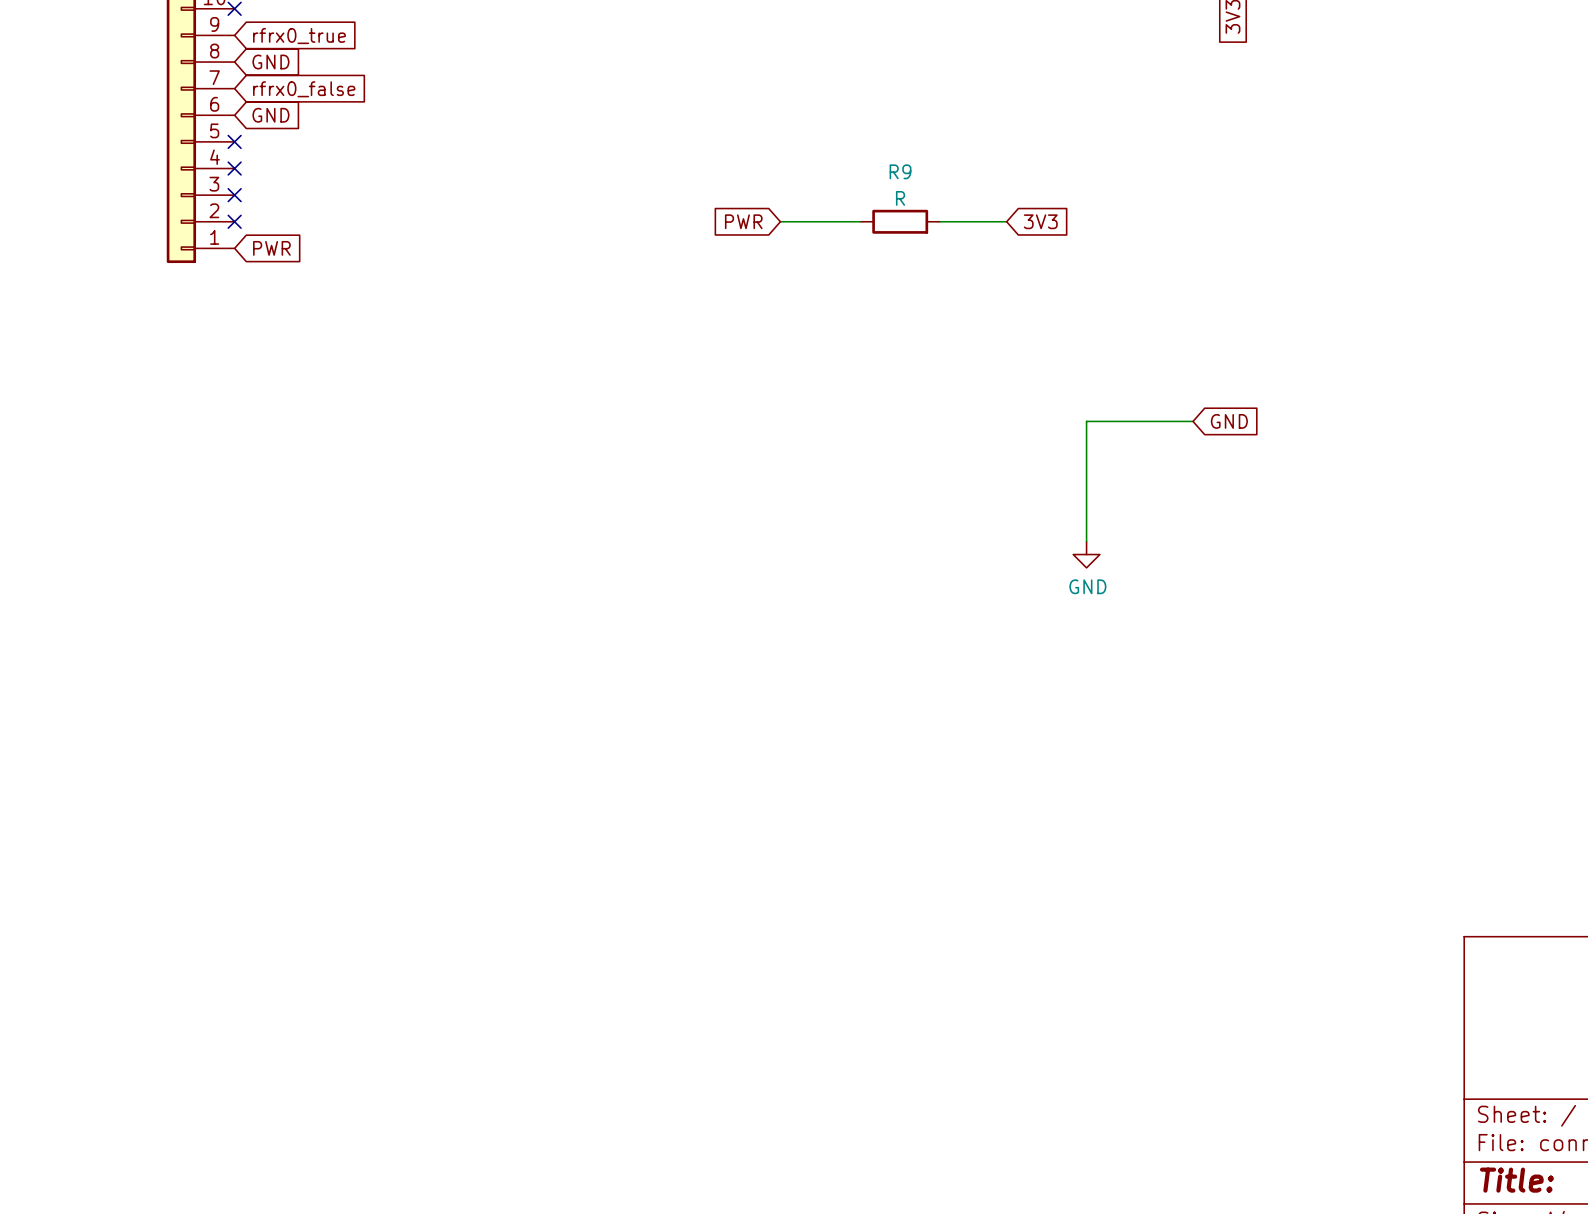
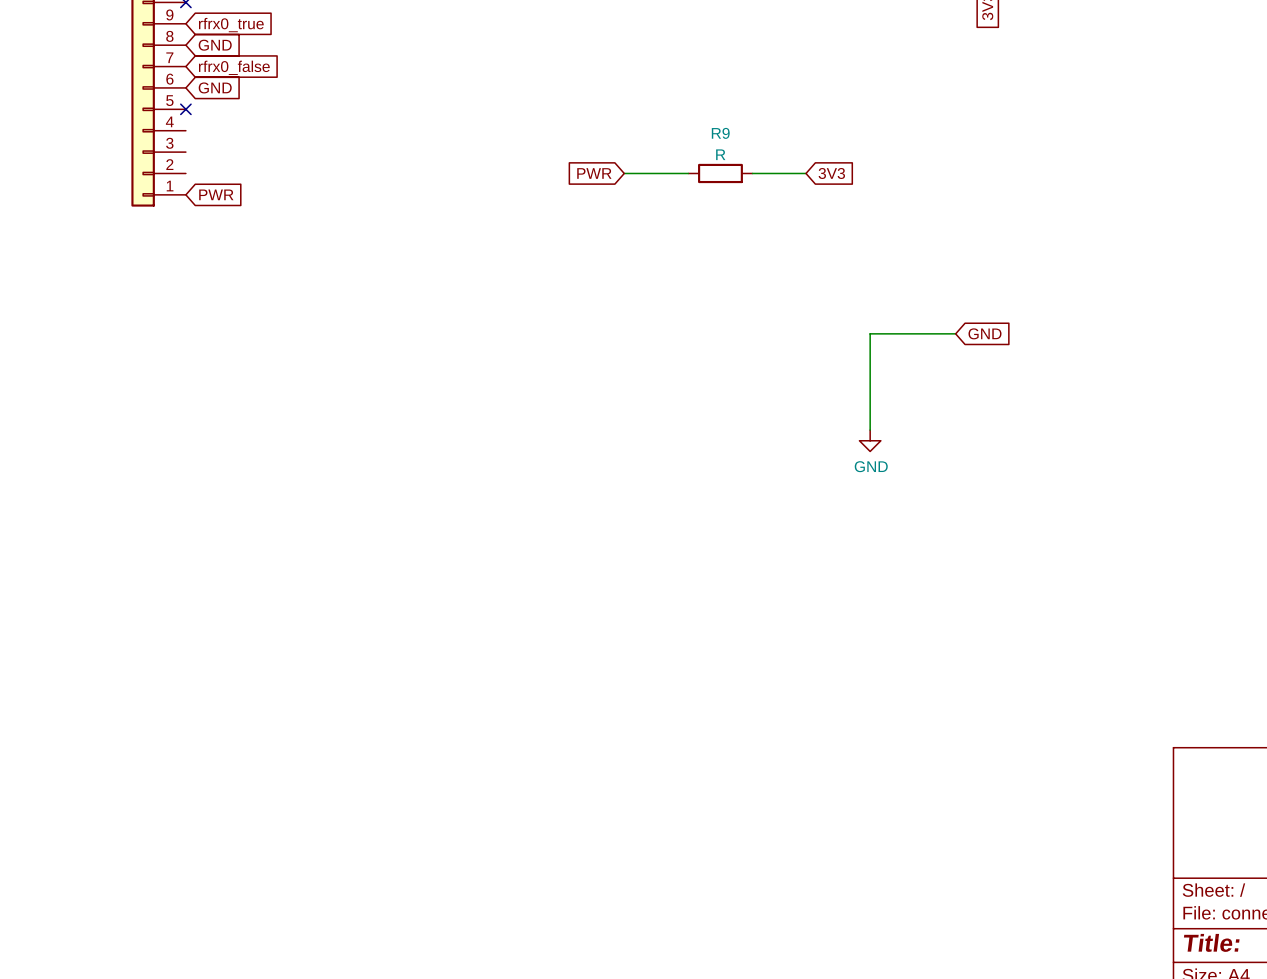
no-connect mark: (234, 168) -> none
no-connect mark: (234, 195) -> none
no-connect mark: (234, 221) -> none

